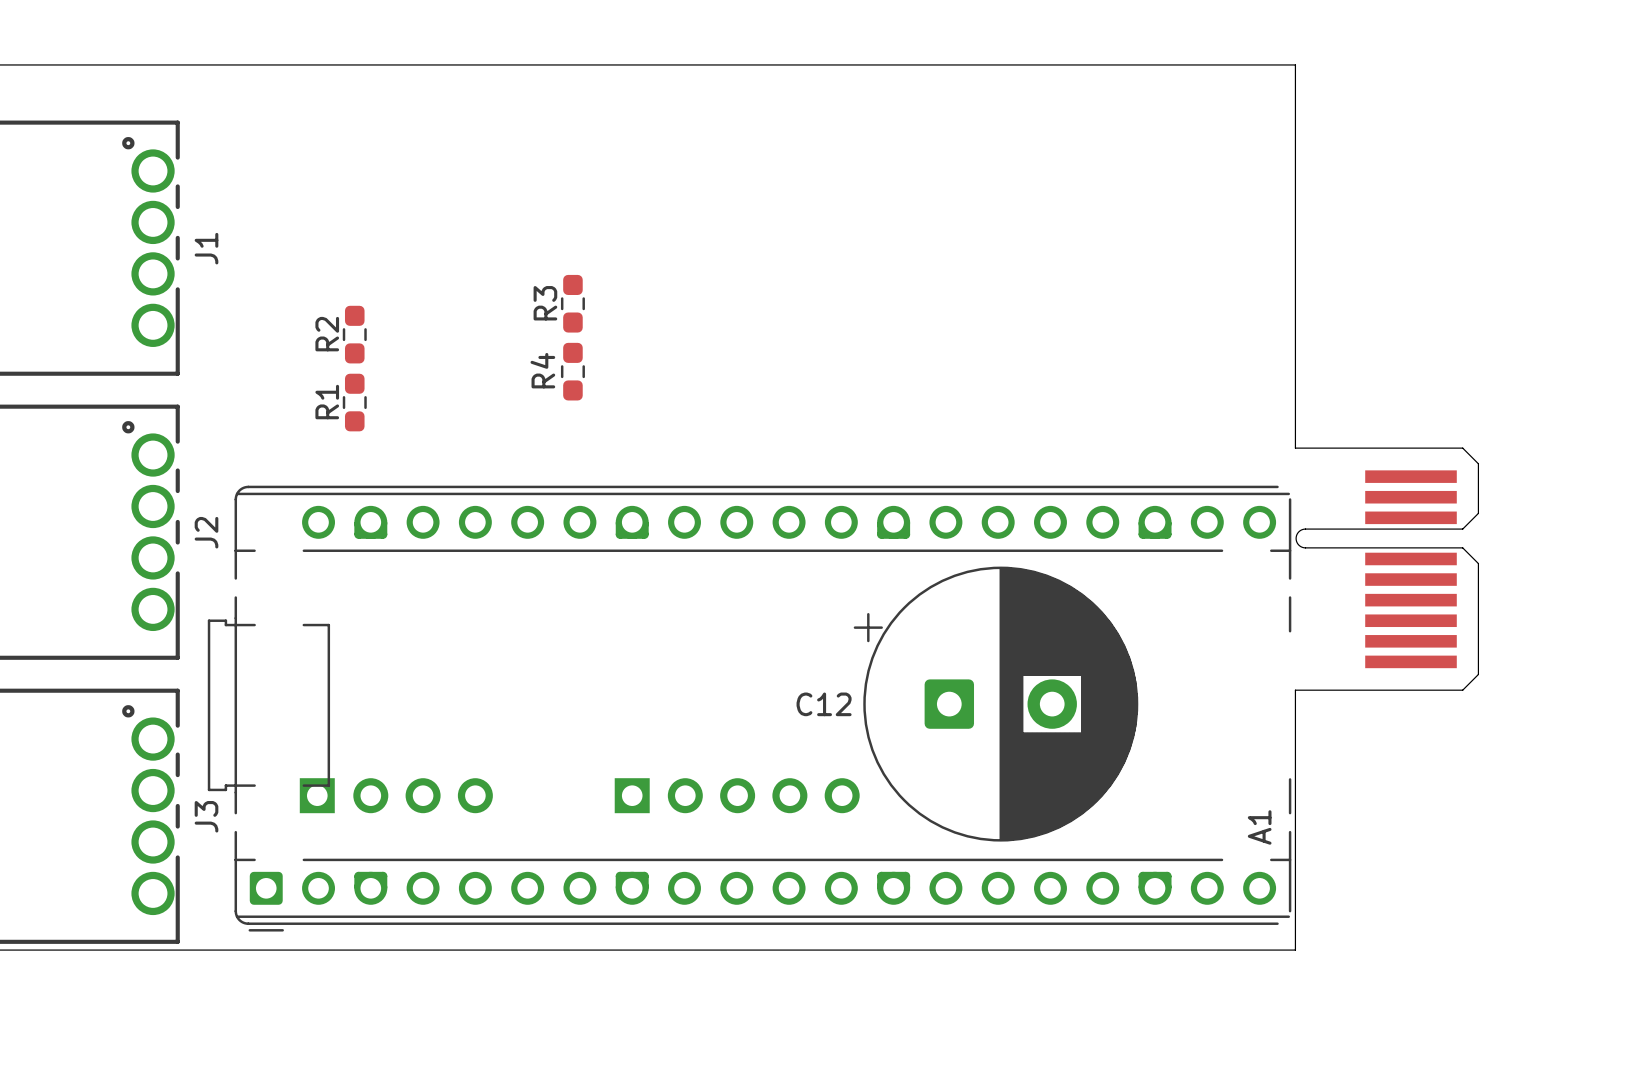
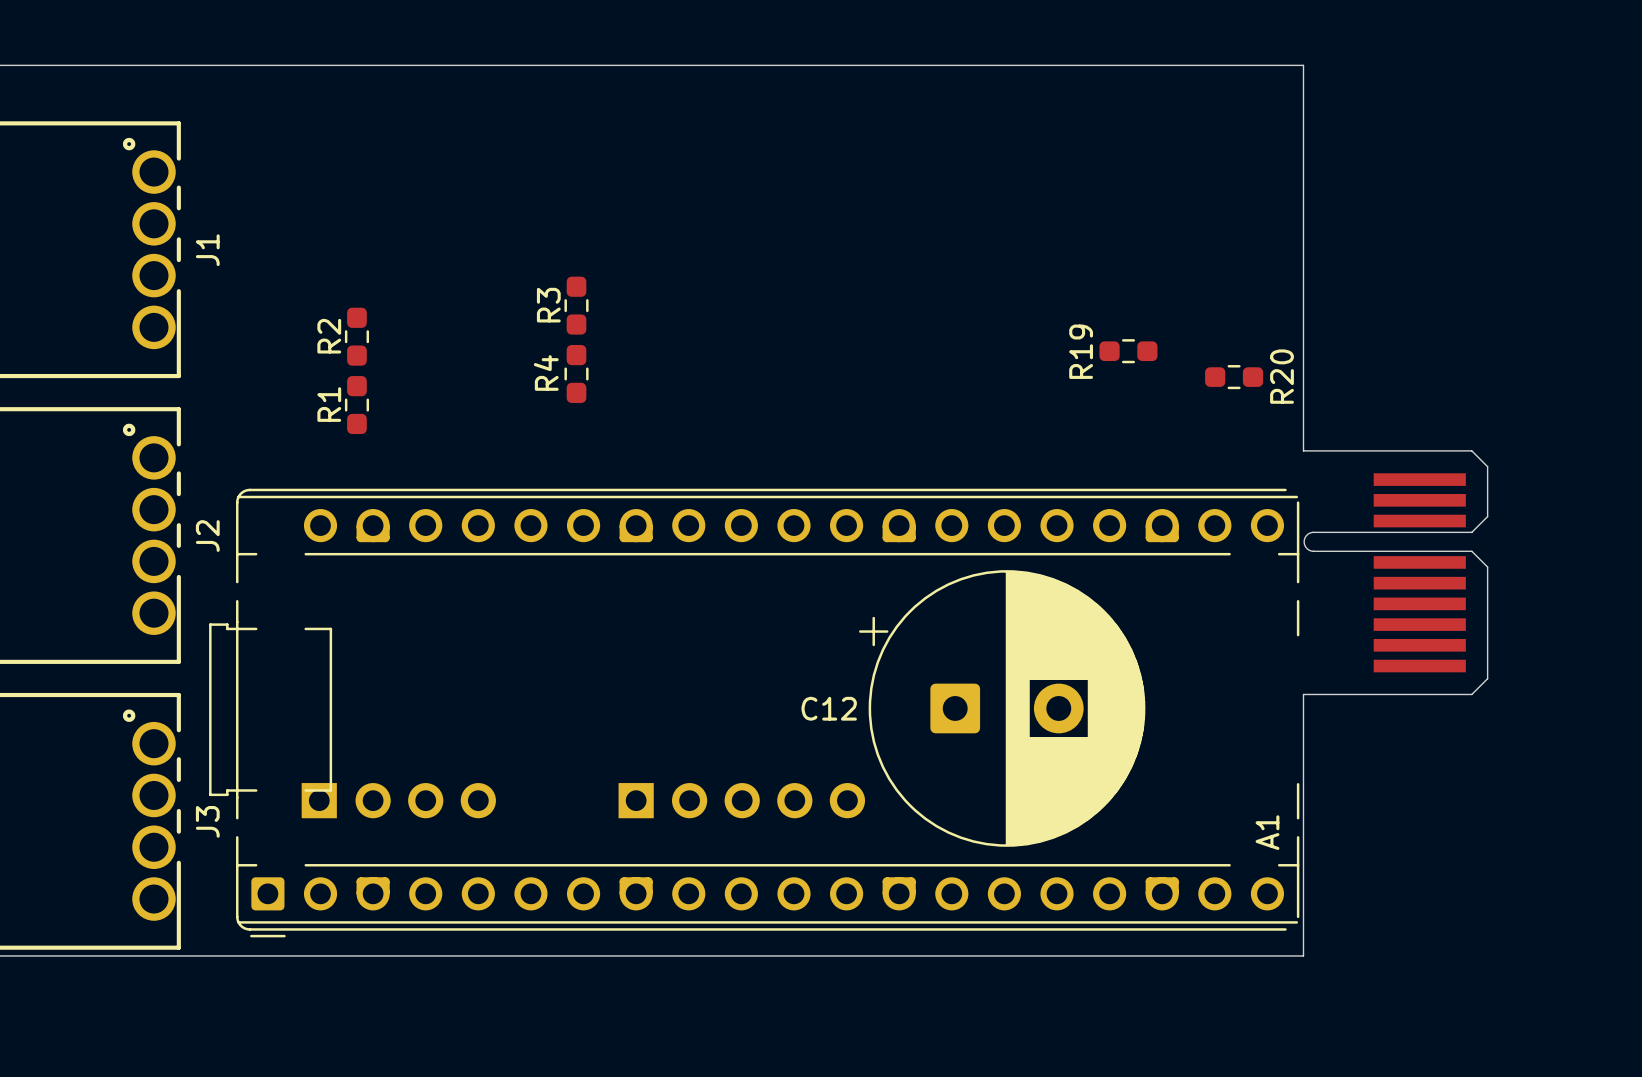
R19: none -> (1128, 351)
R20: none -> (1234, 377)

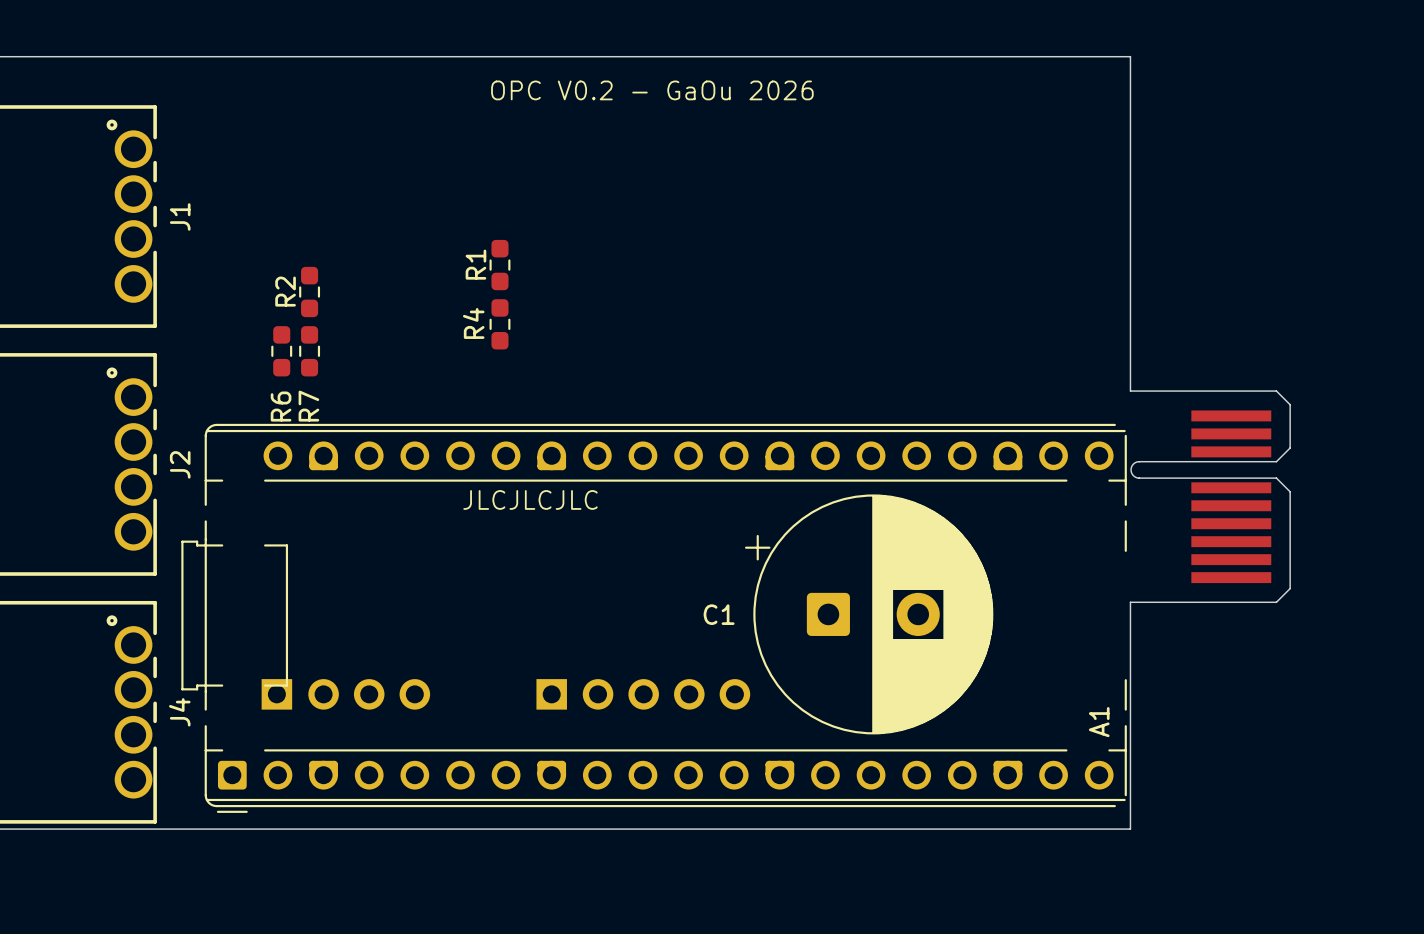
text: none -> OPC V0.2 - GaOu 2026 (652, 90)
R3 name: R3 (548, 305) -> R1 (475, 264)
R19: (1128, 351) -> none
R20: (1234, 377) -> none
R1 name: R1 (329, 404) -> R7 (308, 406)
R6: none -> (281, 351)
text: none -> JLCJLCJLC (530, 499)
C12 name: C12 (829, 708) -> C1 (719, 614)
J3 name: J3 (207, 821) -> J4 (179, 712)

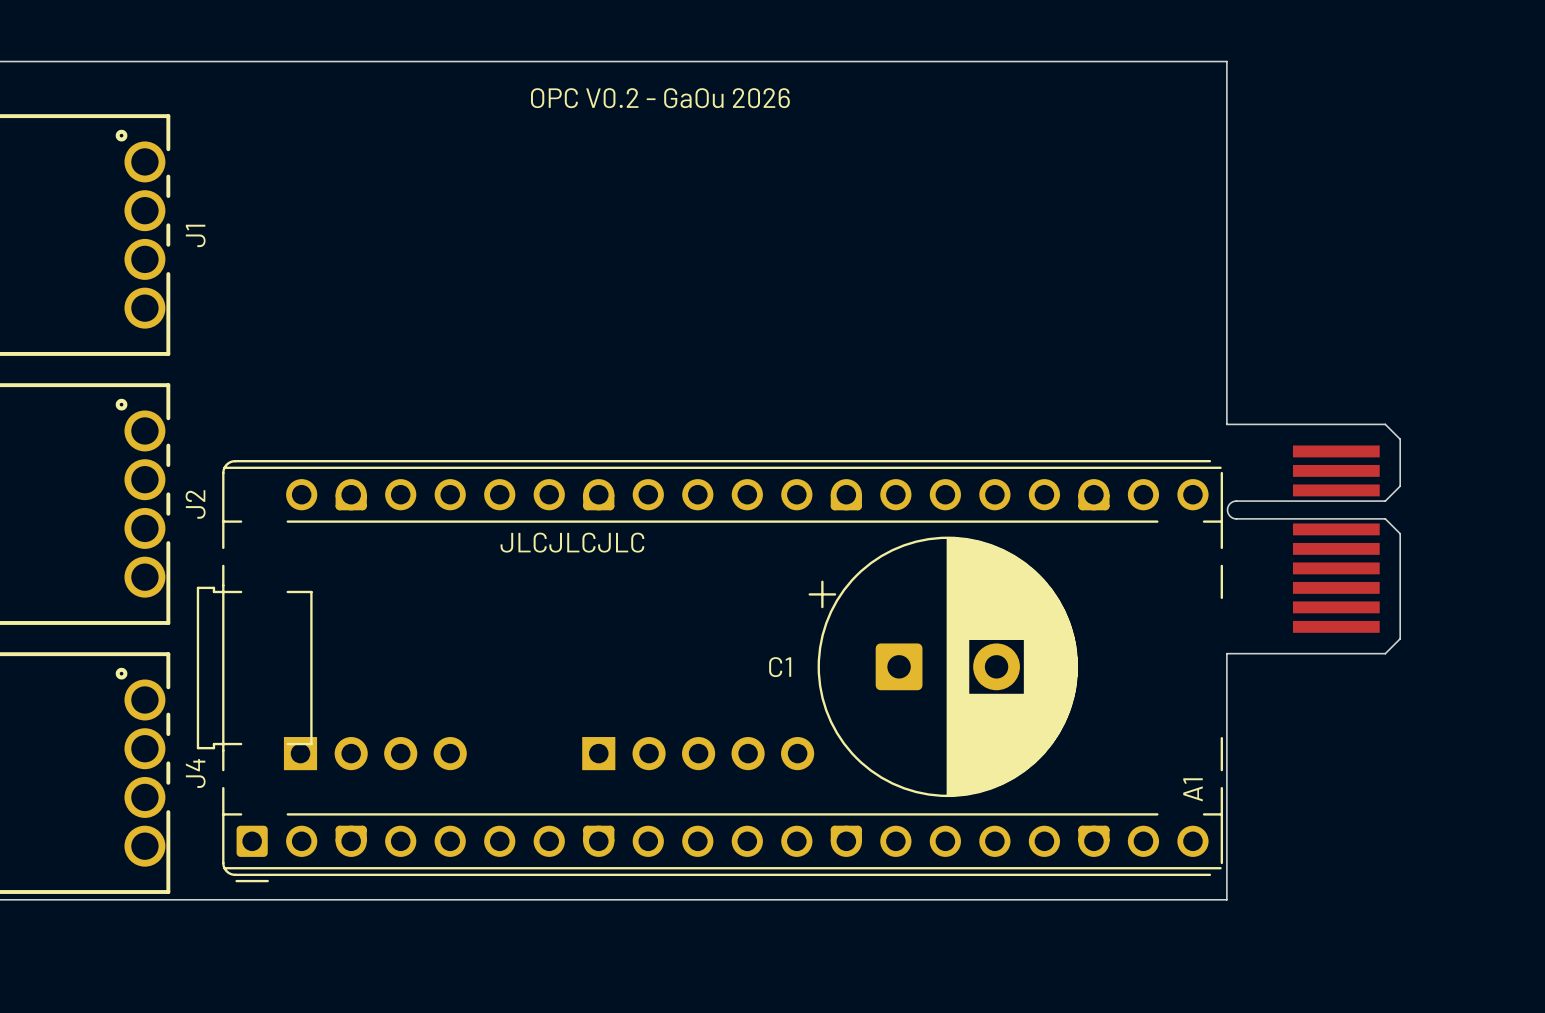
R1: (499, 265) -> none
R2: (309, 292) -> none
R4: (499, 324) -> none
R6: (281, 351) -> none
R7: (309, 351) -> none

